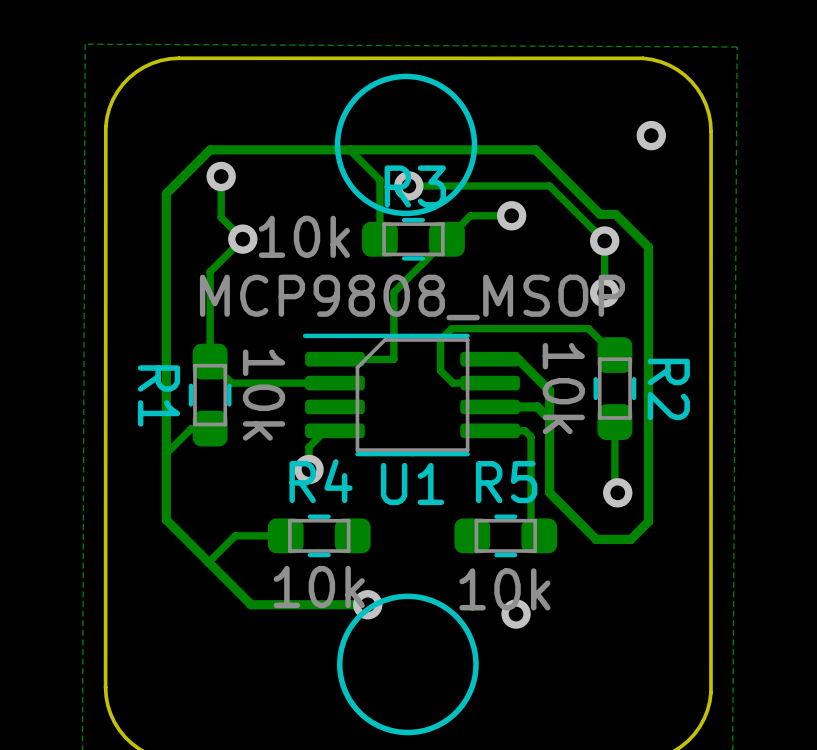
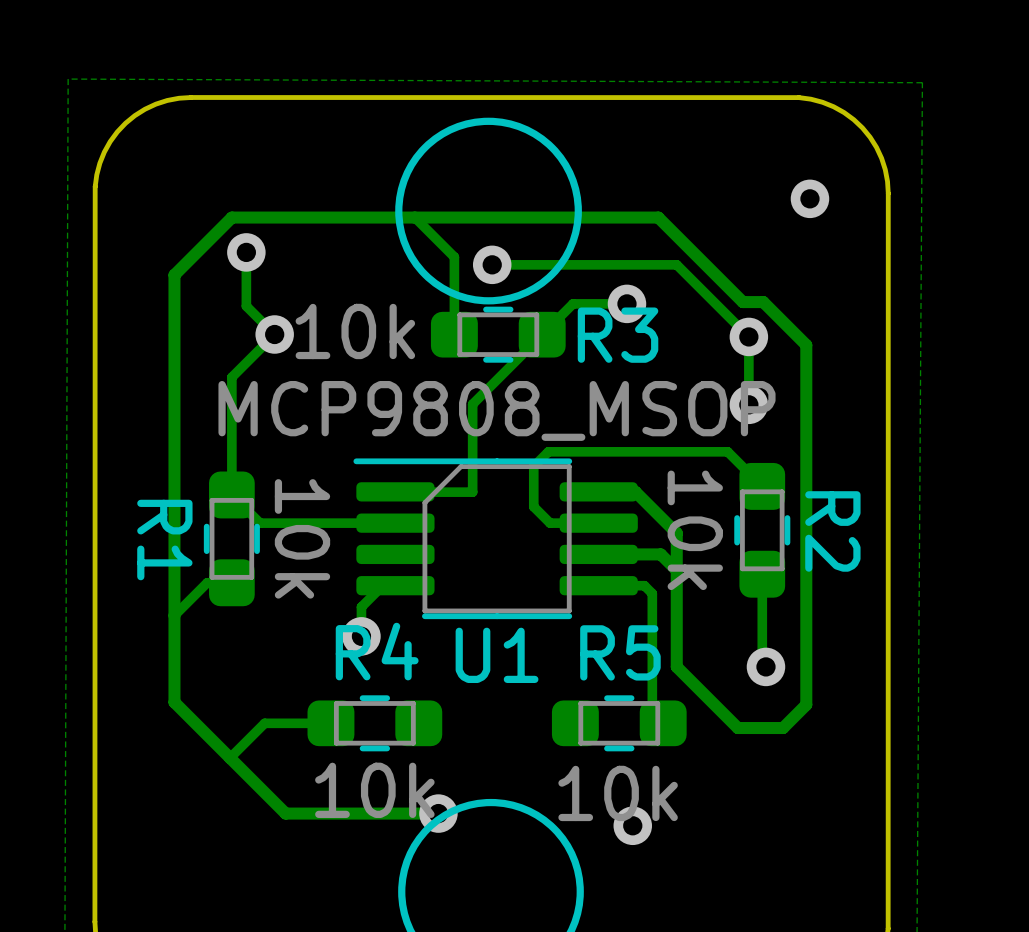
R3 name position: R3 (415, 186) -> R3 (618, 335)

